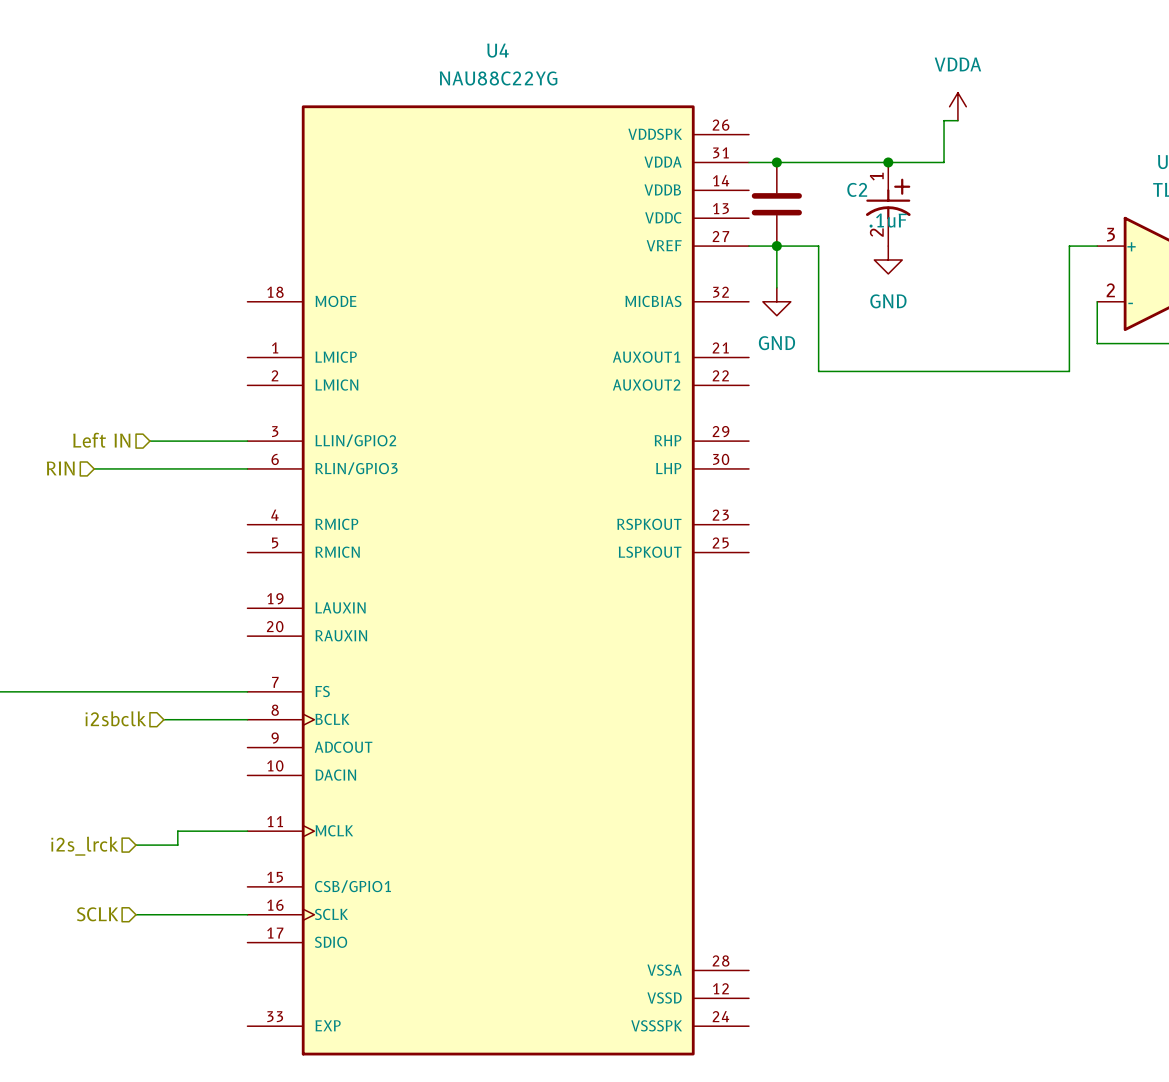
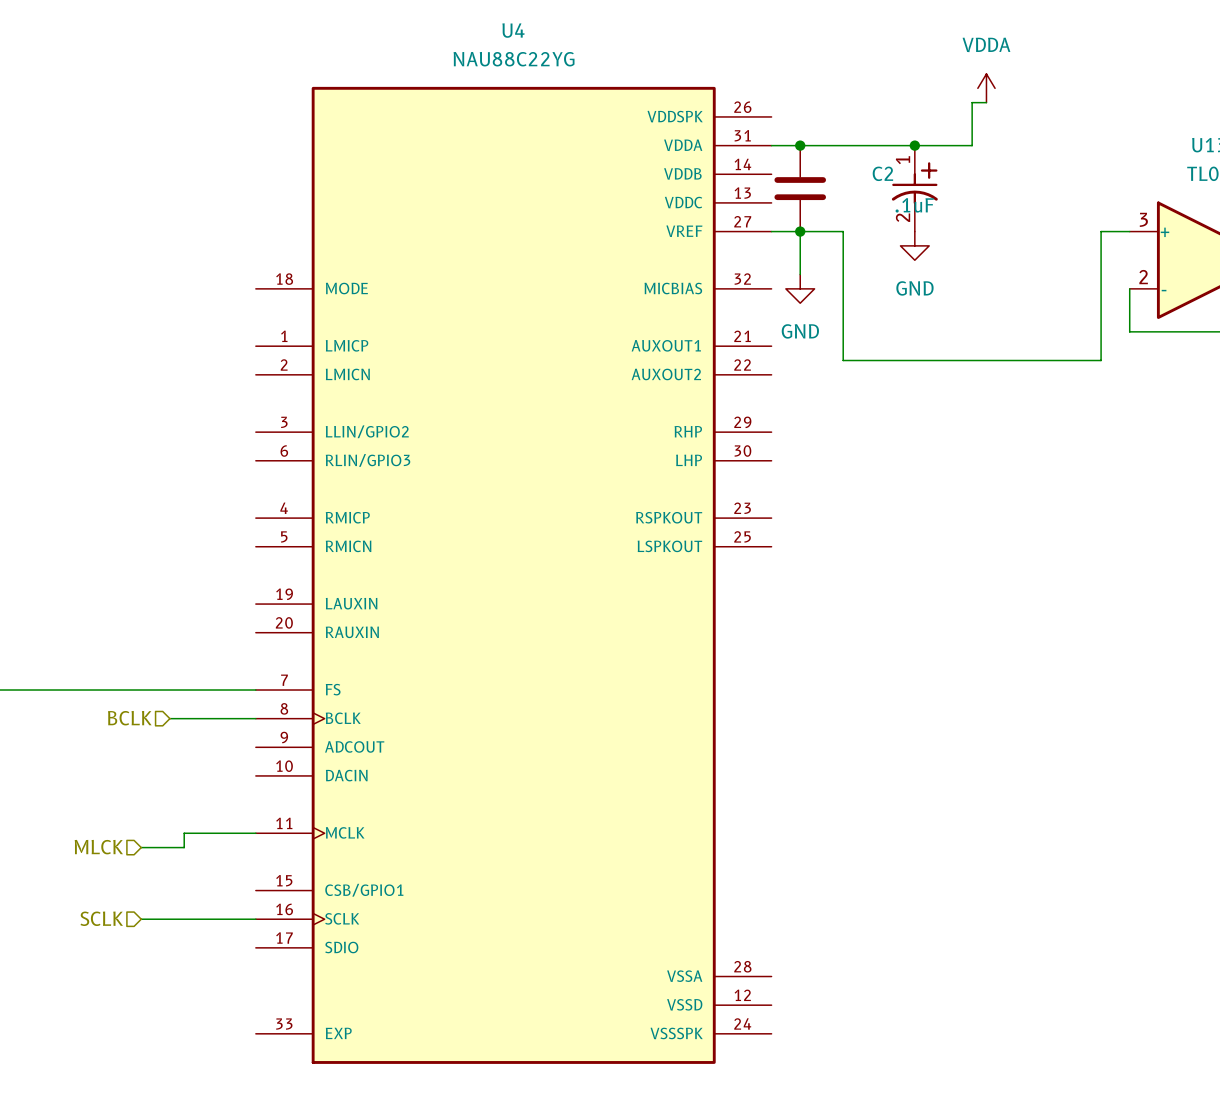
hierarchical label: Left IN (101, 440) -> none
wire: (149, 441) (247, 441) -> none
hierarchical label: RIN (60, 468) -> none
wire: (94, 468) (247, 468) -> none
hierarchical label: i2sbclk (115, 718) -> BCLK (129, 718)
hierarchical label: i2s_lrck (84, 846) -> MLCK (98, 847)

